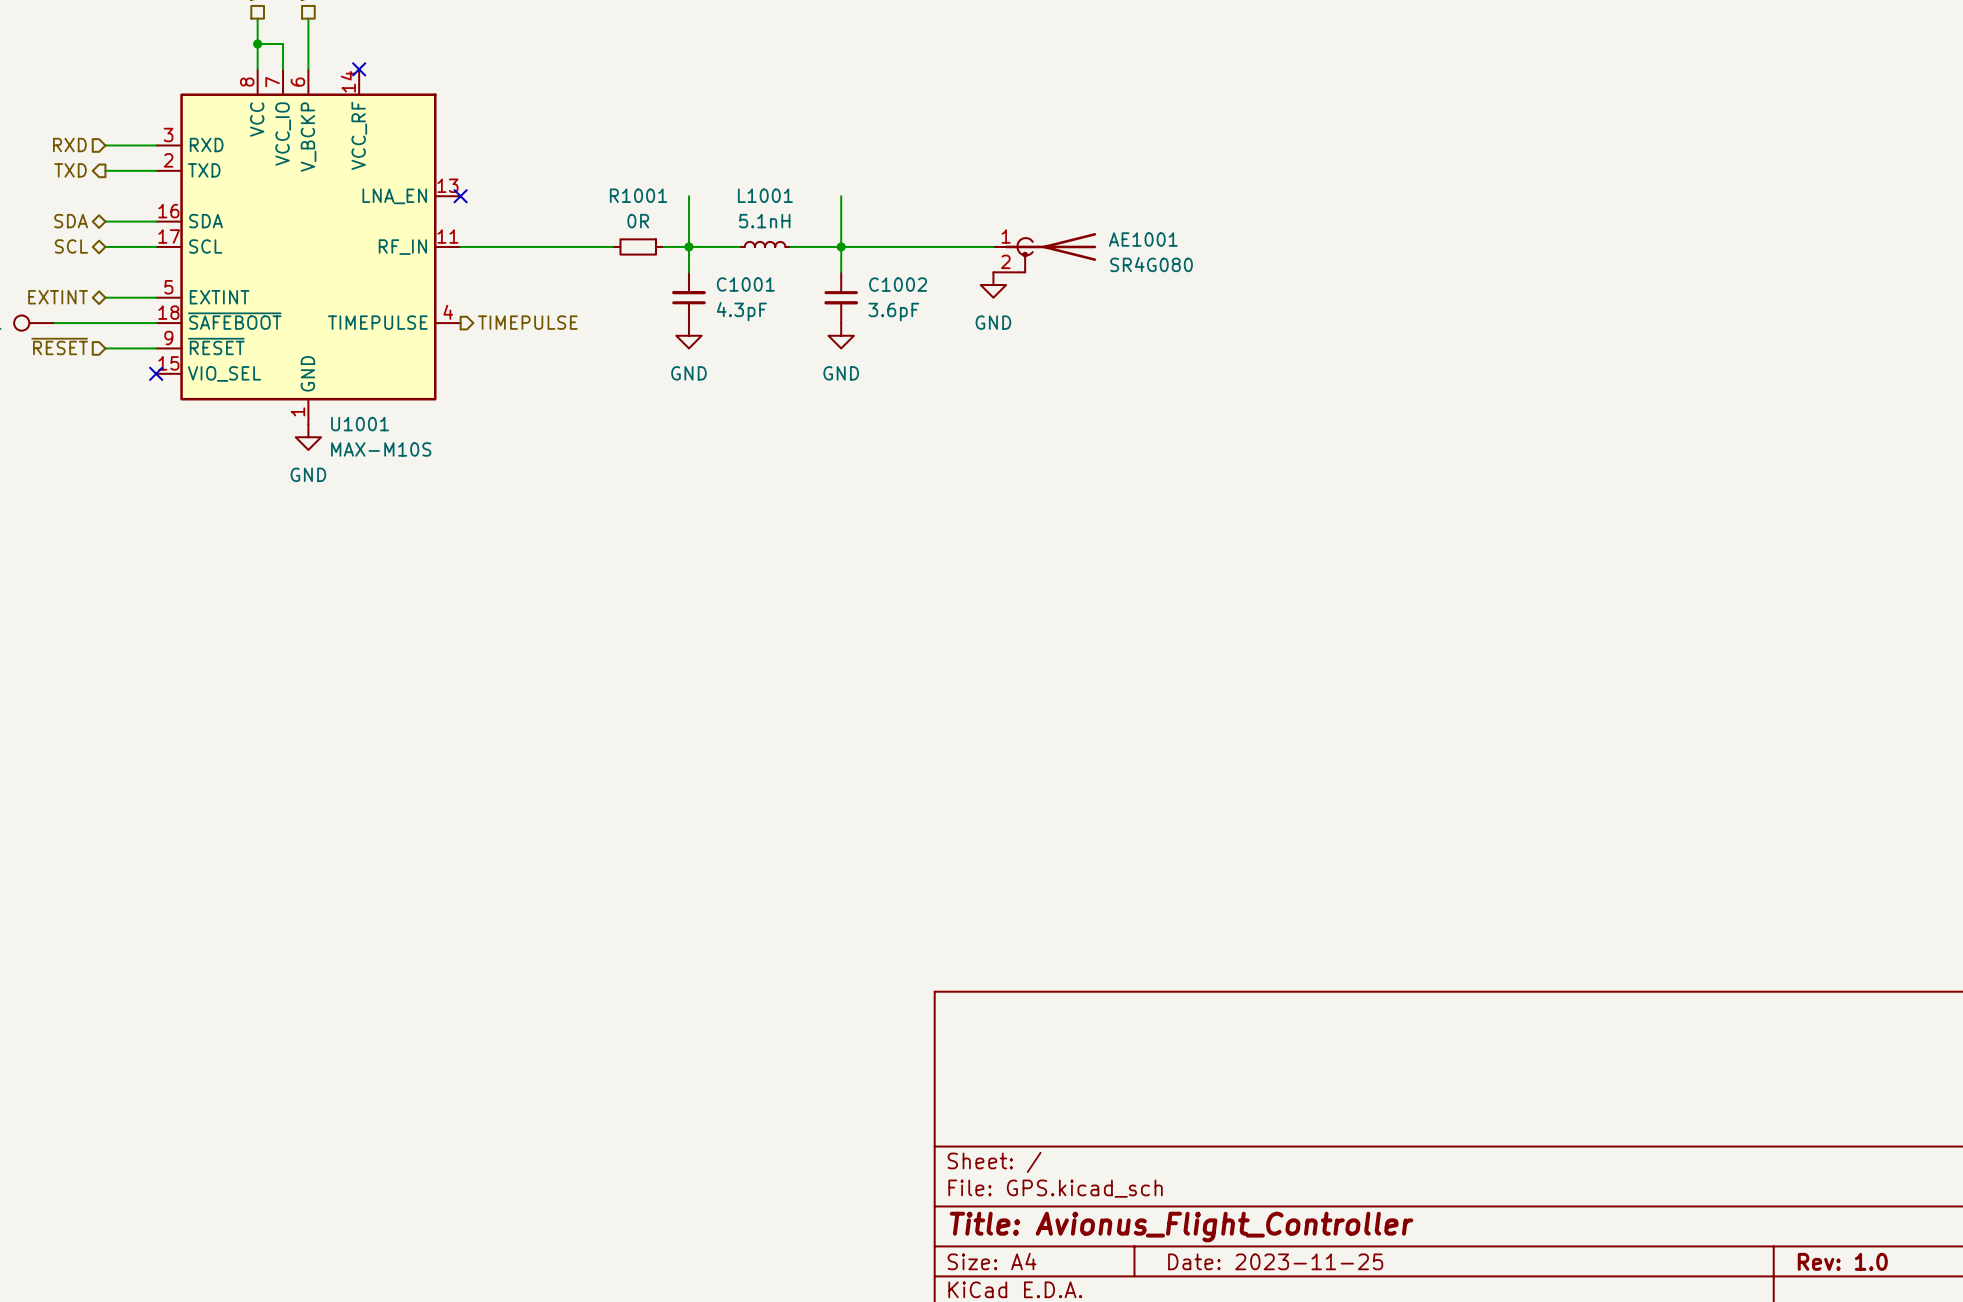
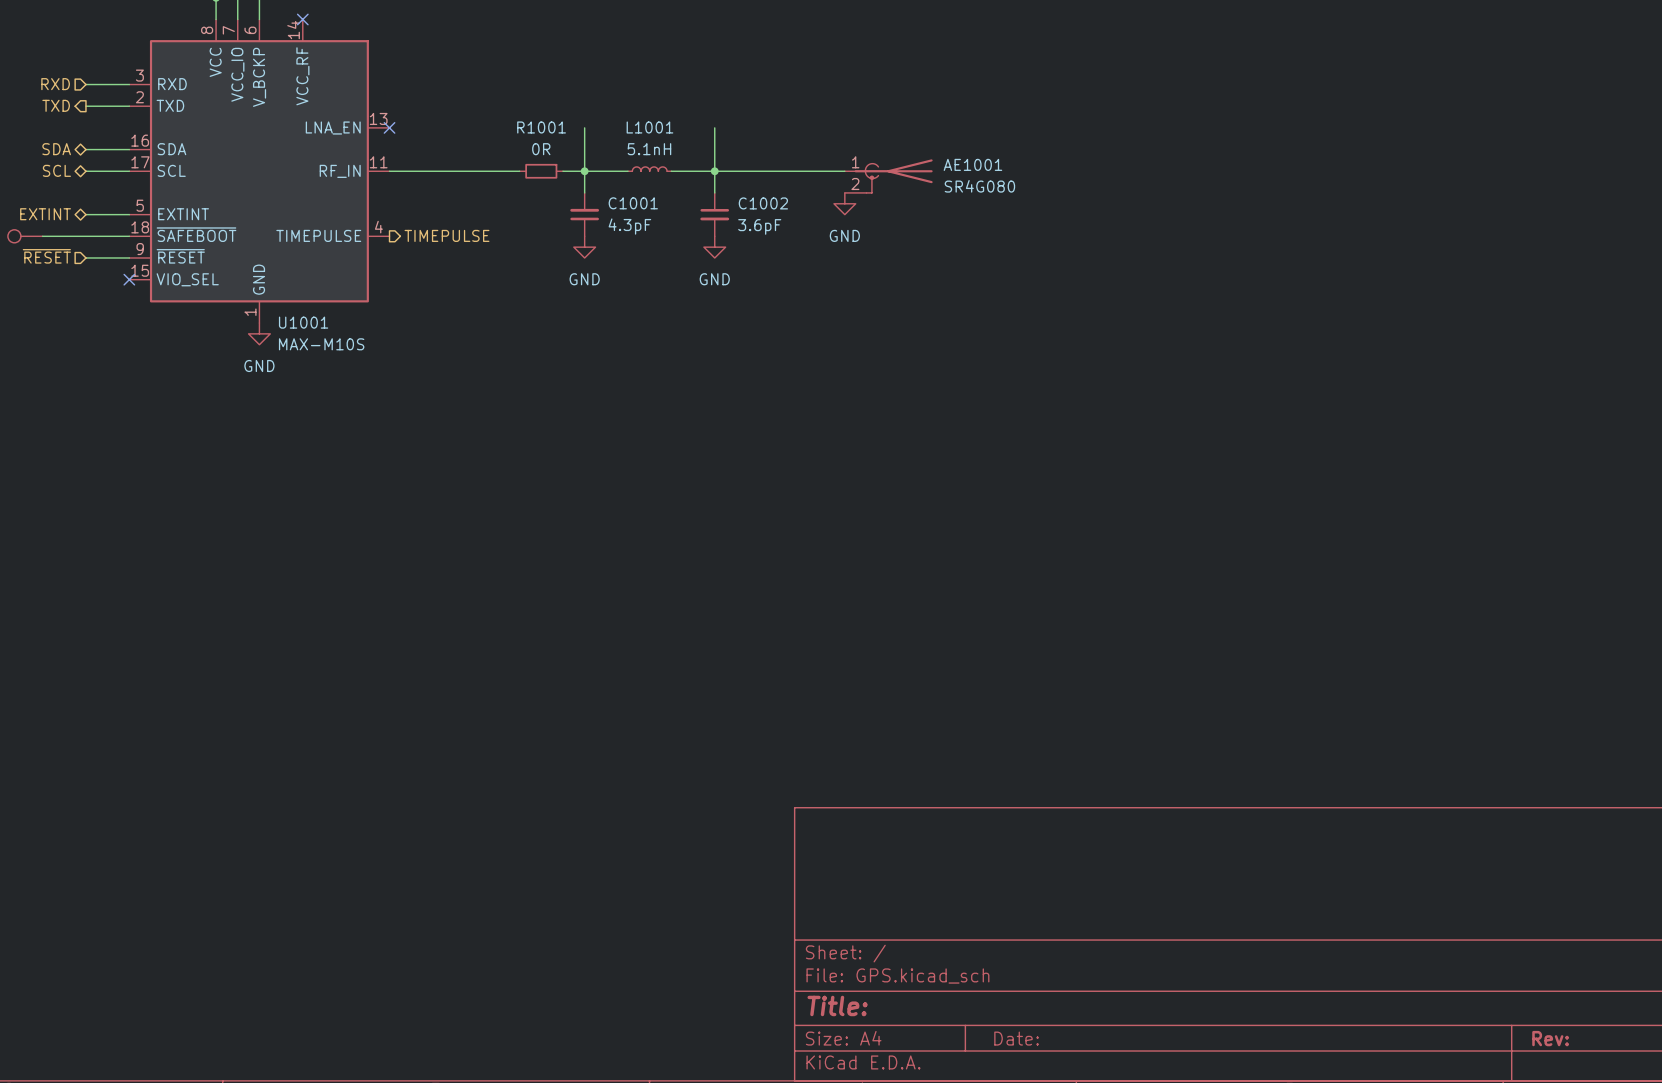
title block: Title: Avionus_Flight_Controller (1181, 1227) -> Title: (837, 1005)
title block: Date: 2023-11-25 (1275, 1261) -> Date: (1016, 1038)
title block: Rev: 1.0 (1842, 1261) -> Rev: (1550, 1038)

